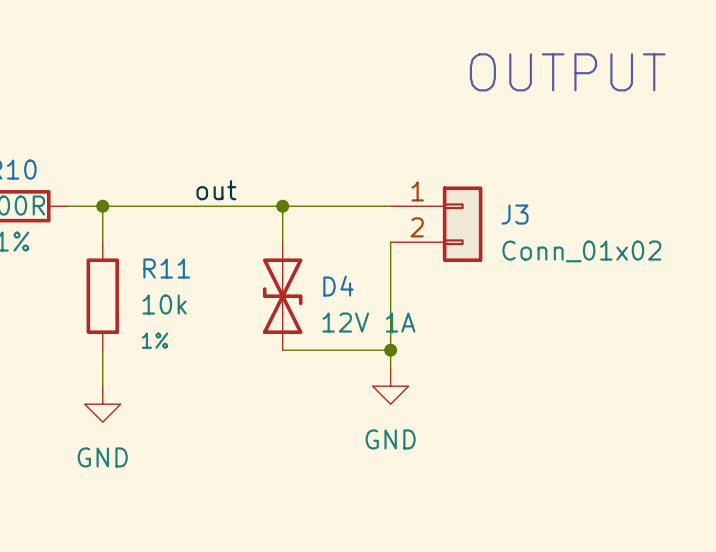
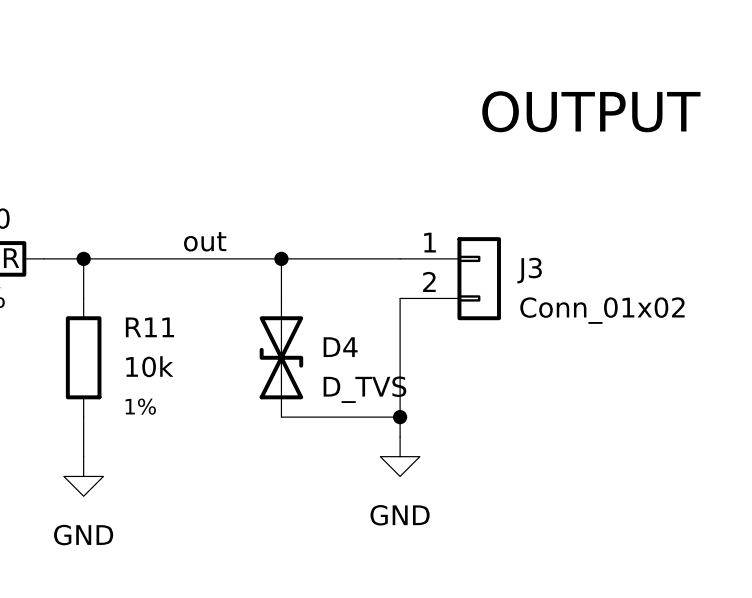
D4 value: 12V 1A (368, 322) -> D_TVS (364, 389)

